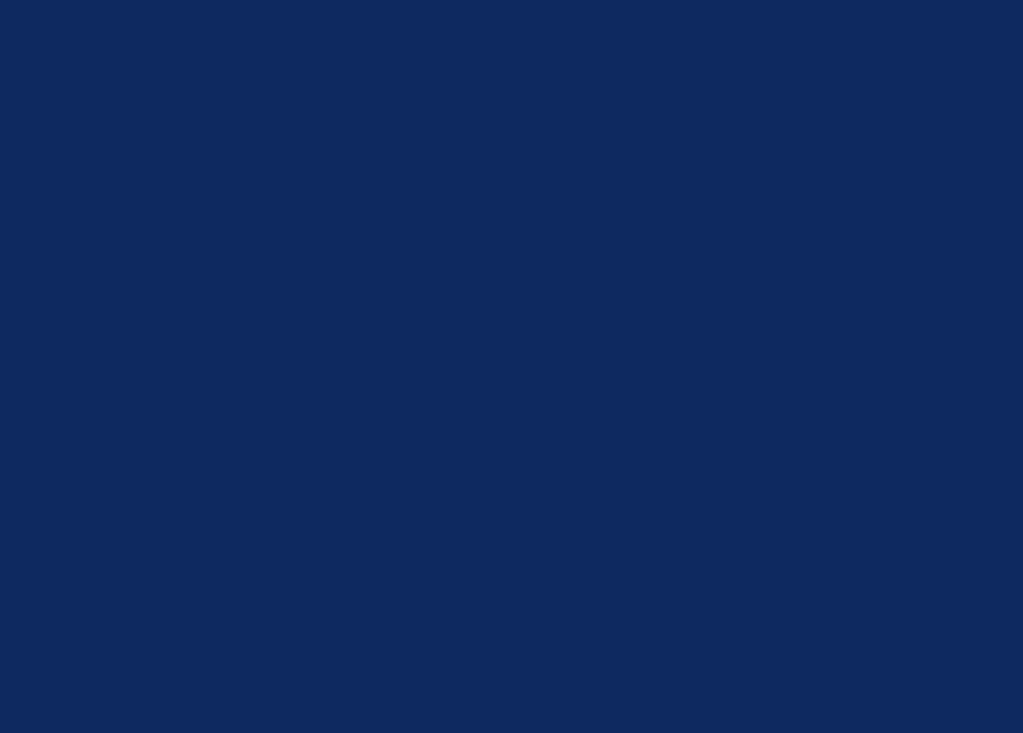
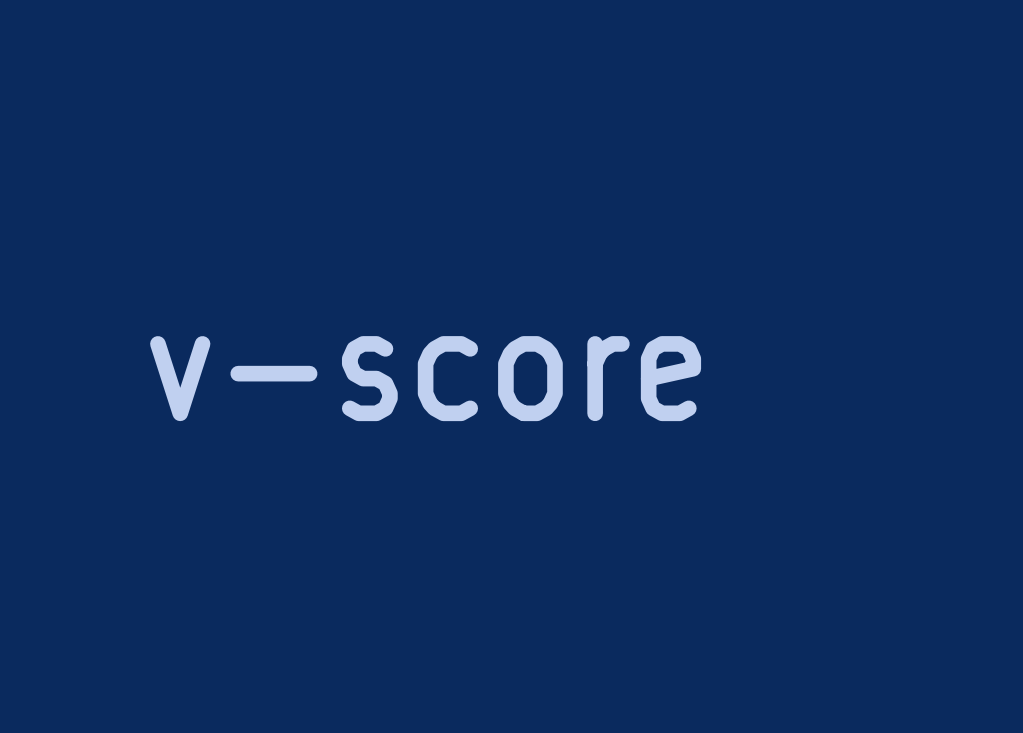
text: none -> v-score (425, 378)

